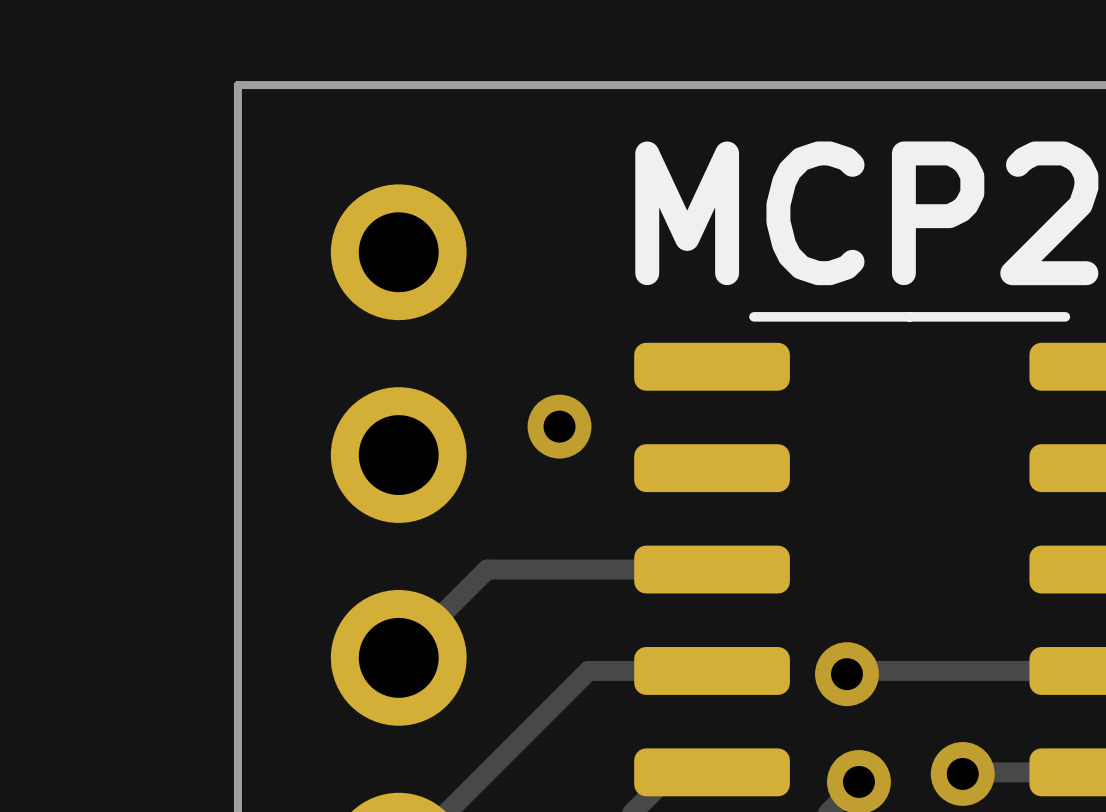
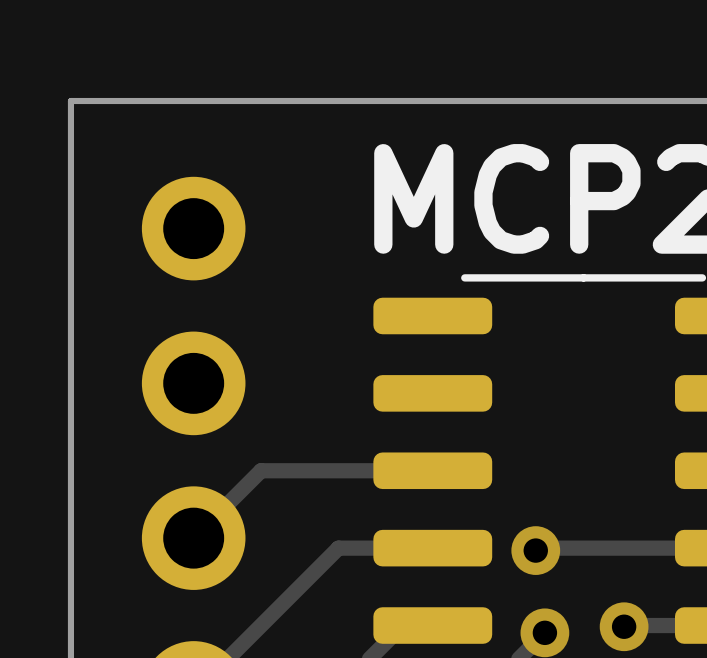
via: (559, 426) -> none

